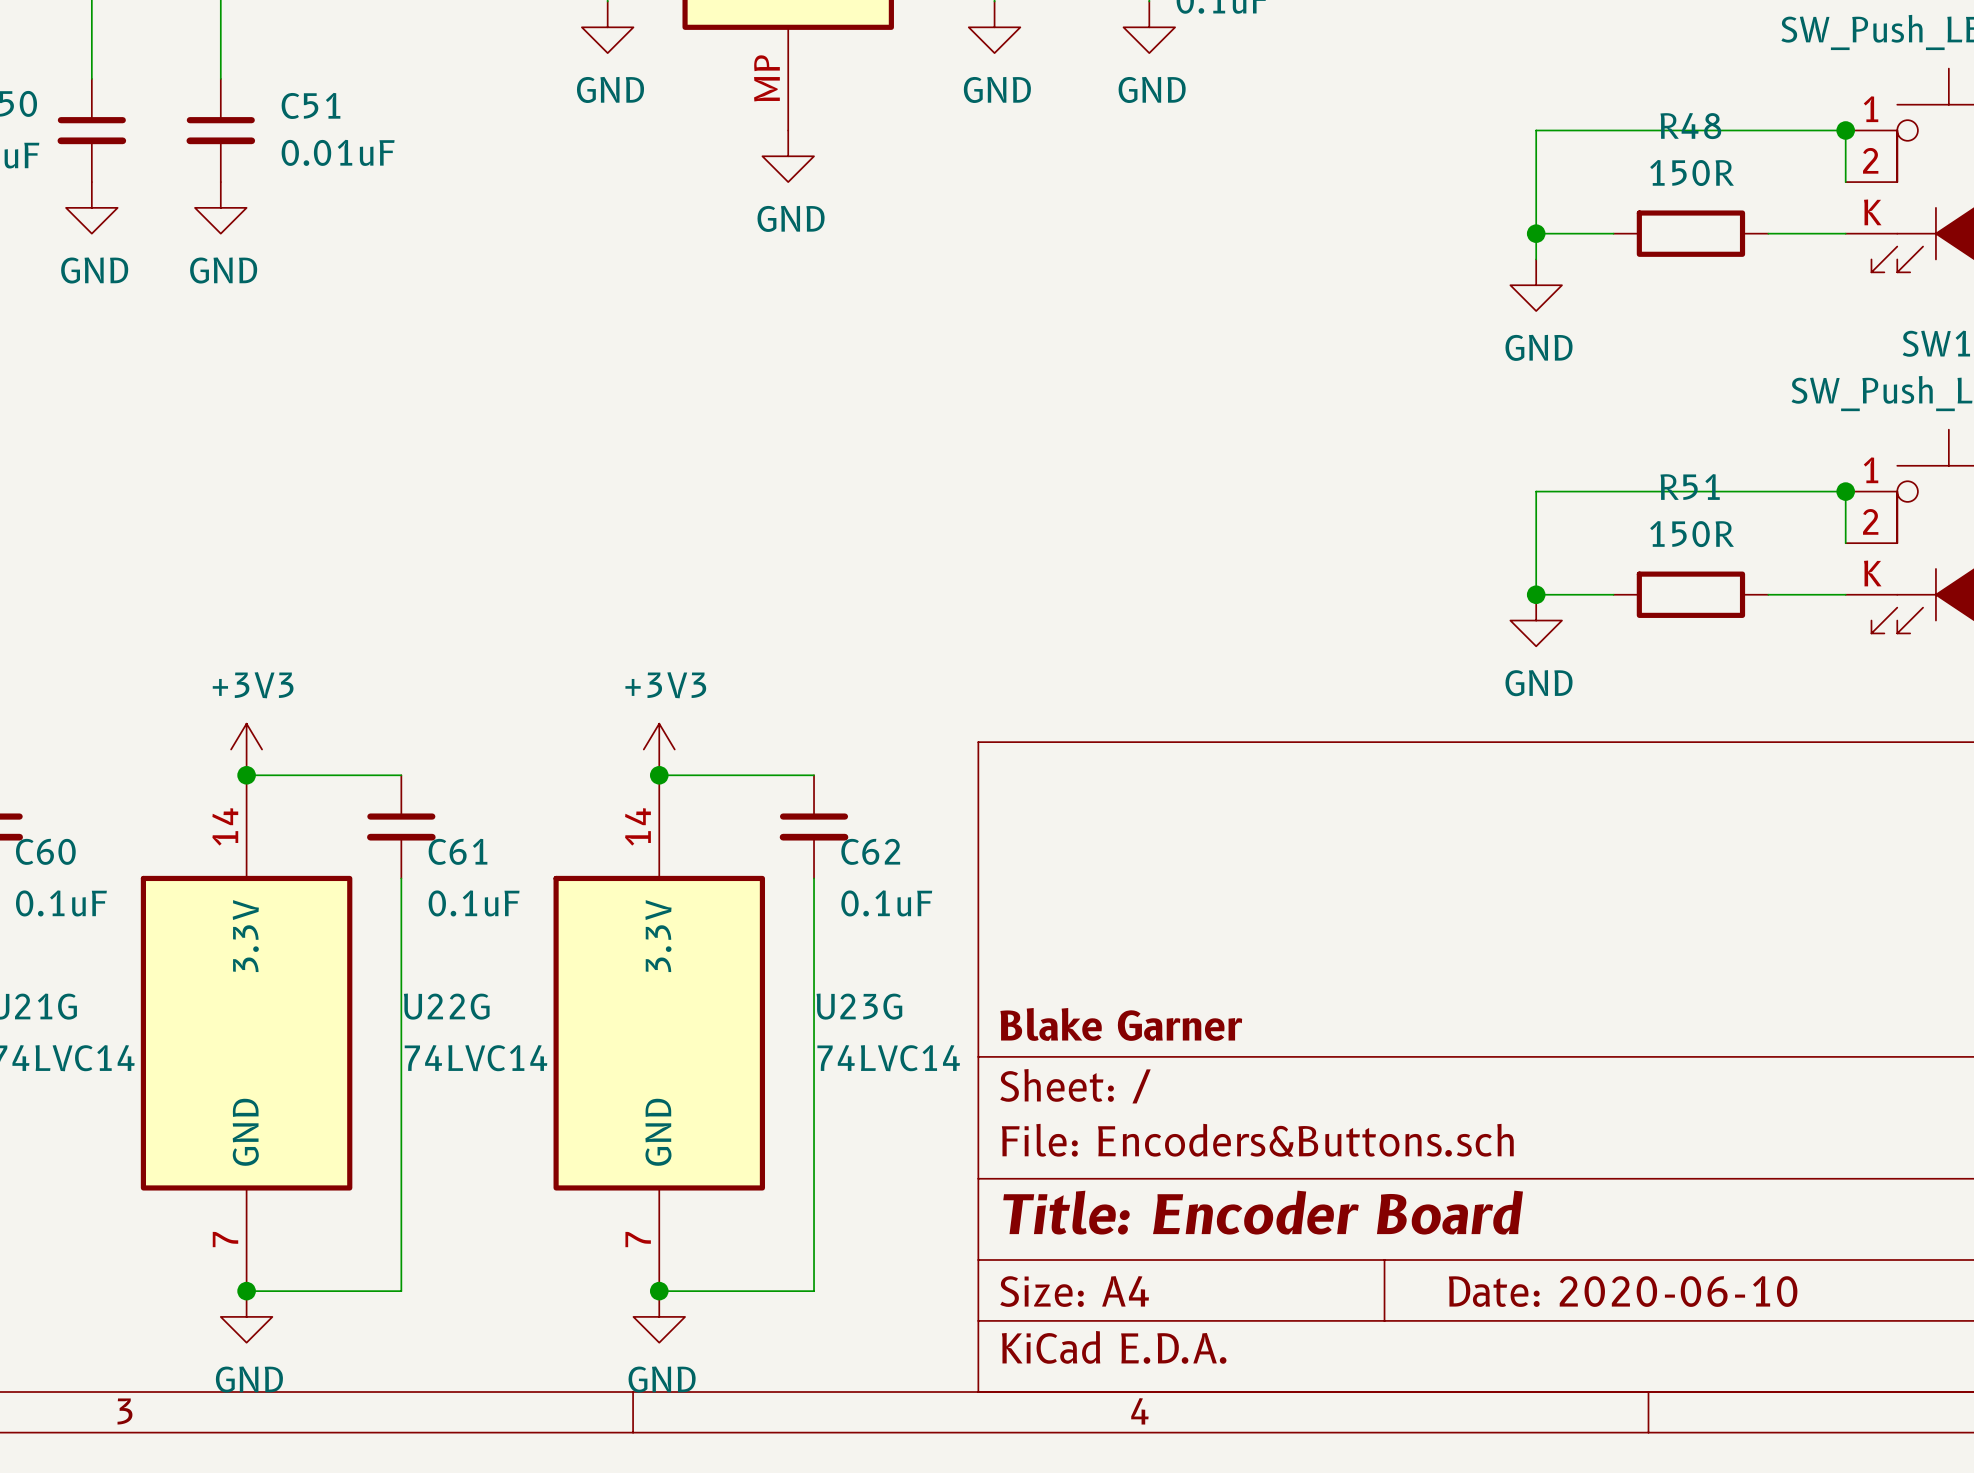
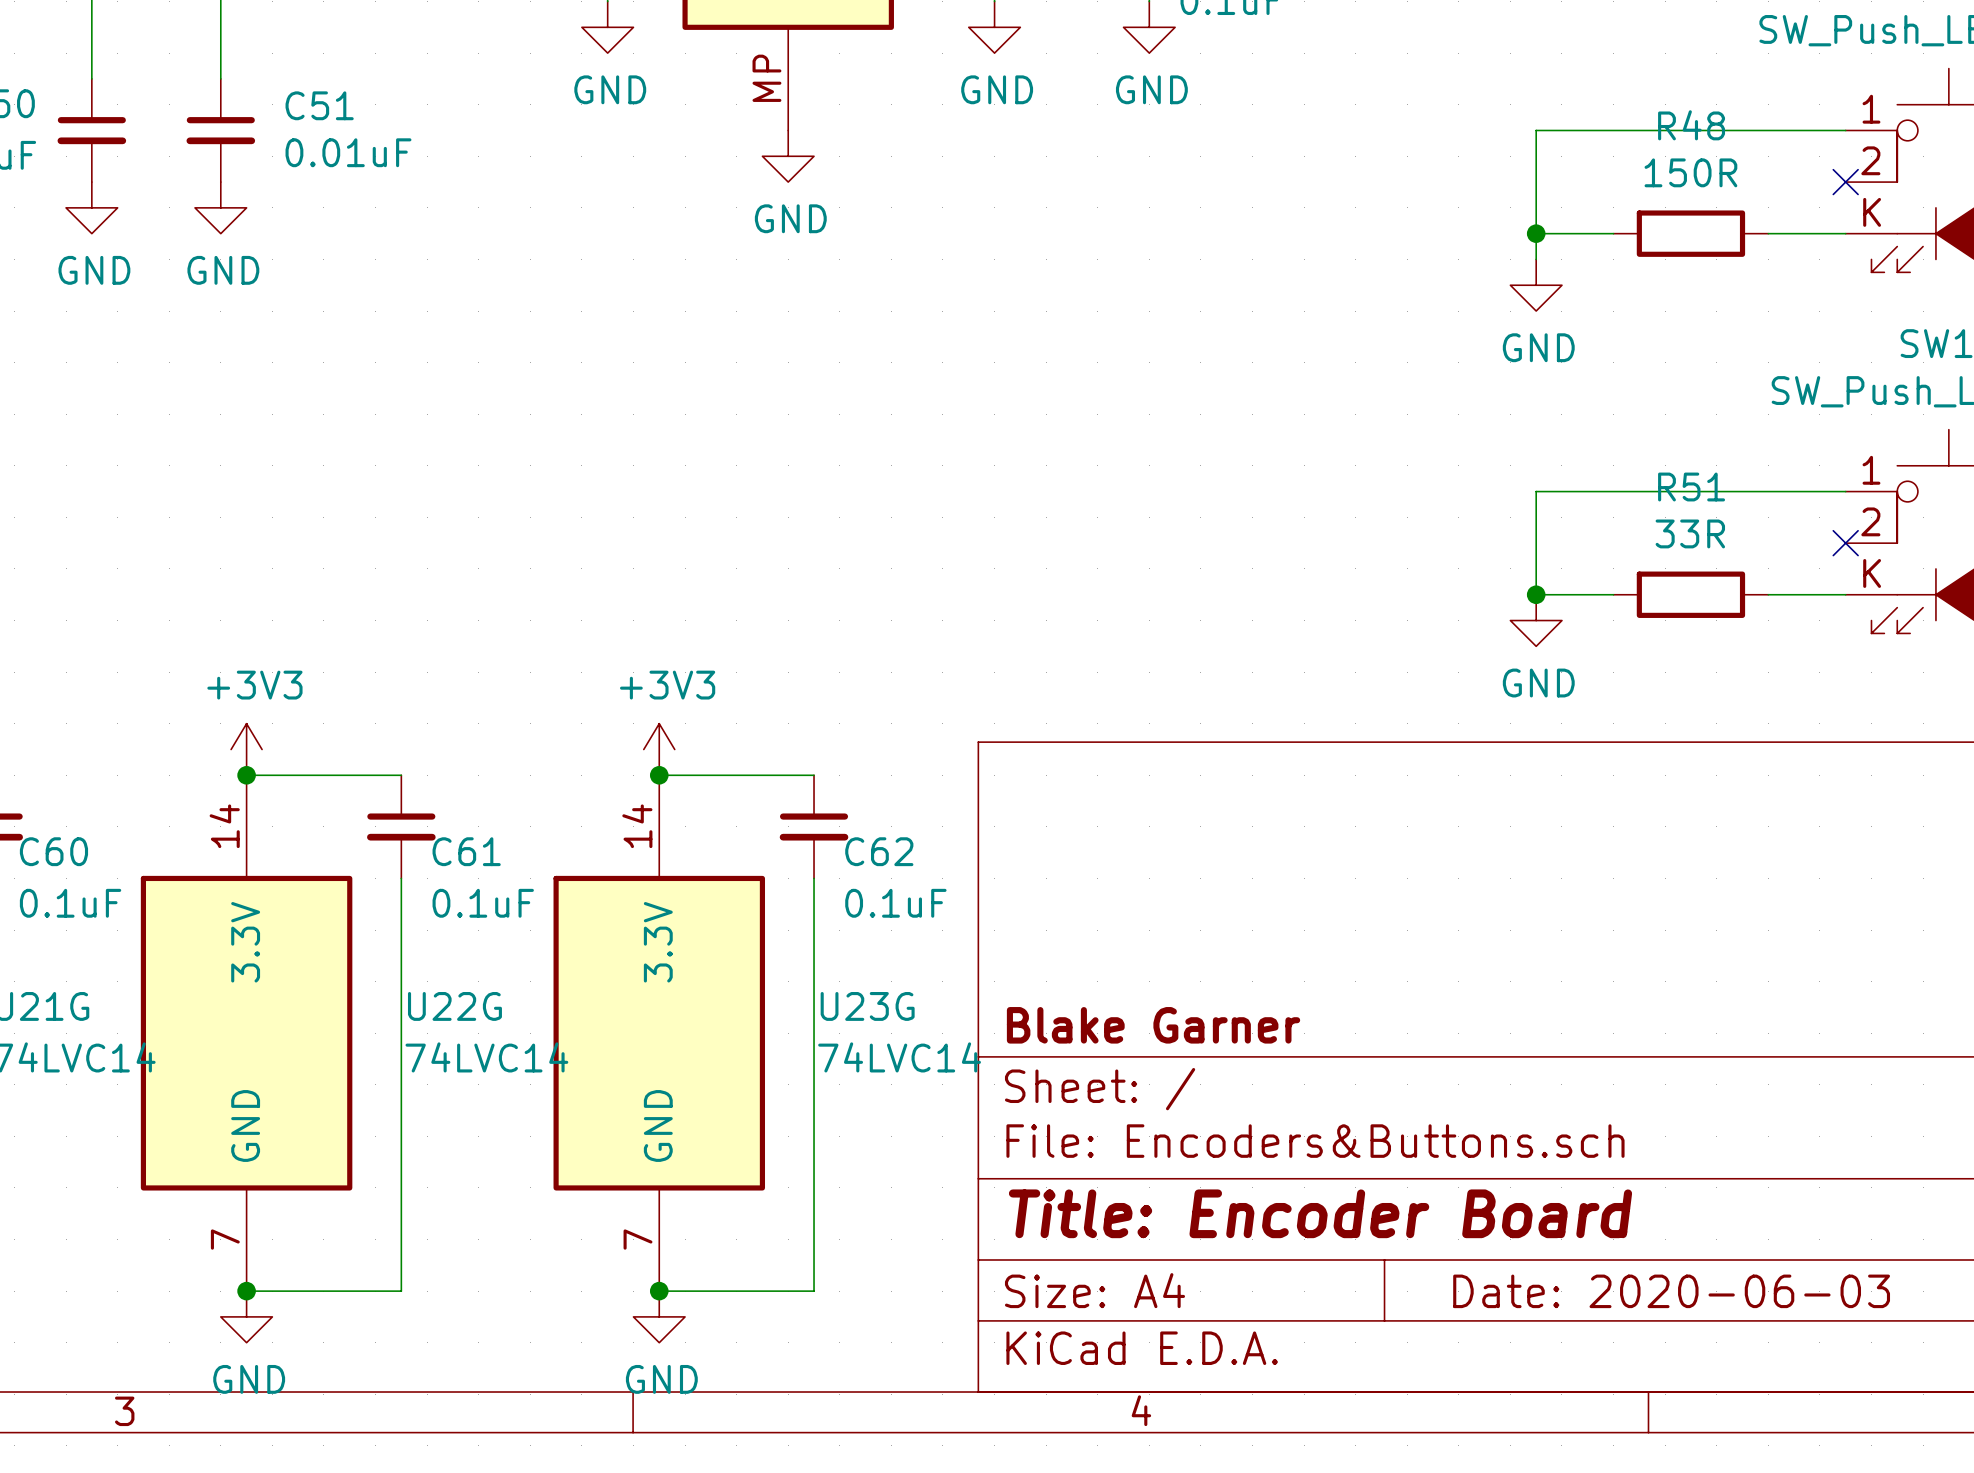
wire: (1845, 130) (1845, 182) -> none
junction: (1845, 130) -> none
no-connect mark: none -> (1845, 182)
wire: (1845, 491) (1845, 543) -> none
junction: (1845, 491) -> none
R51 value: 150R (1692, 534) -> 33R (1690, 533)
no-connect mark: none -> (1845, 543)
title block: Date: 2020-06-10 (1623, 1291) -> Date: 2020-06-03 (1671, 1291)

